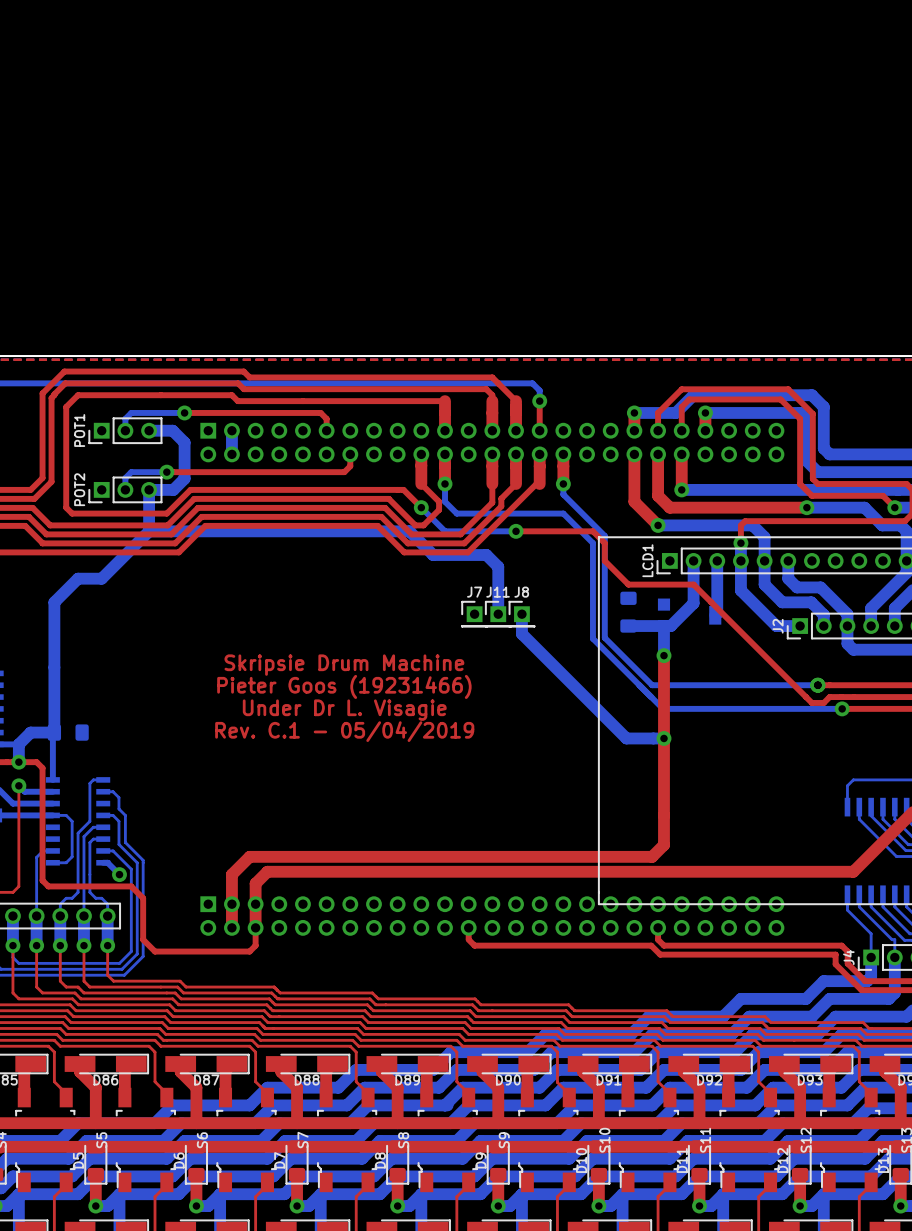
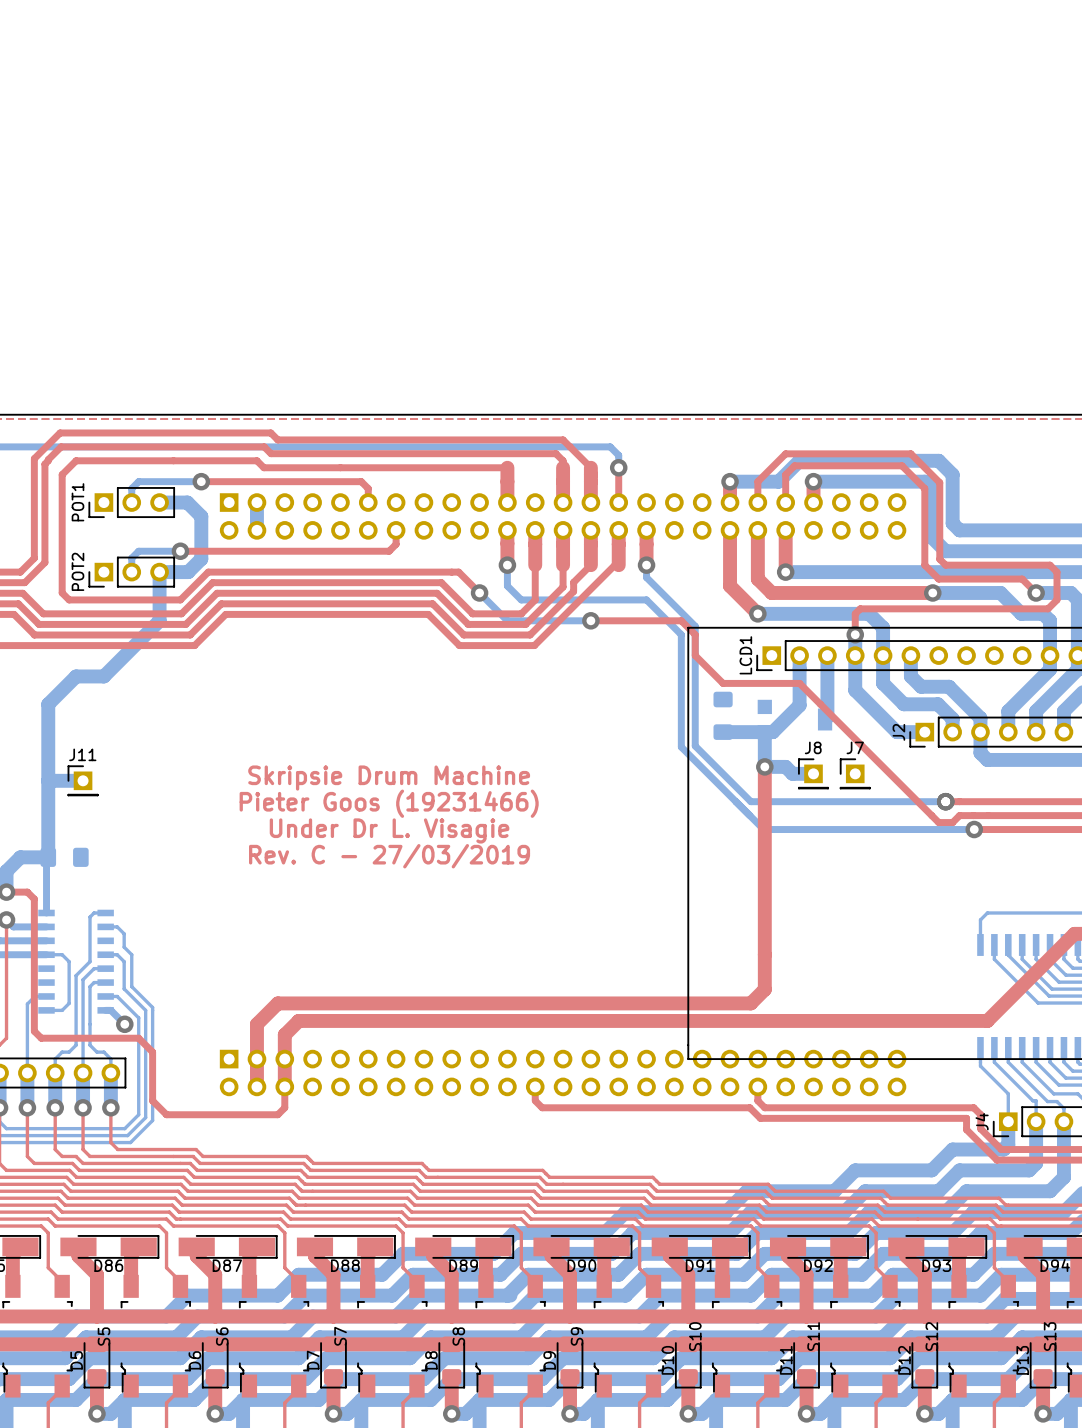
top track: (421, 454) (421, 483) (439, 501) (439, 509) (423, 525) -> (535, 530) (535, 599) (521, 613) (482, 613)
bottom track: (149, 531) (409, 531) (433, 555) (486, 555) (498, 566) (498, 614) -> none
J7 position: (474, 614) -> (855, 773)
J11 position: (498, 614) -> (83, 780)
bottom track: (521, 614) (521, 633) (626, 738) (663, 738) -> none
J8 position: (521, 614) -> (813, 773)
bottom track: none -> (764, 766) (785, 766) (792, 773) (813, 773)
bottom track: none -> (48, 780) (83, 780)
text: Rev. C.1 - 05/04/2019 (344, 731) -> Rev. C - 27/03/2019 (389, 856)
via: (663, 738) -> none

